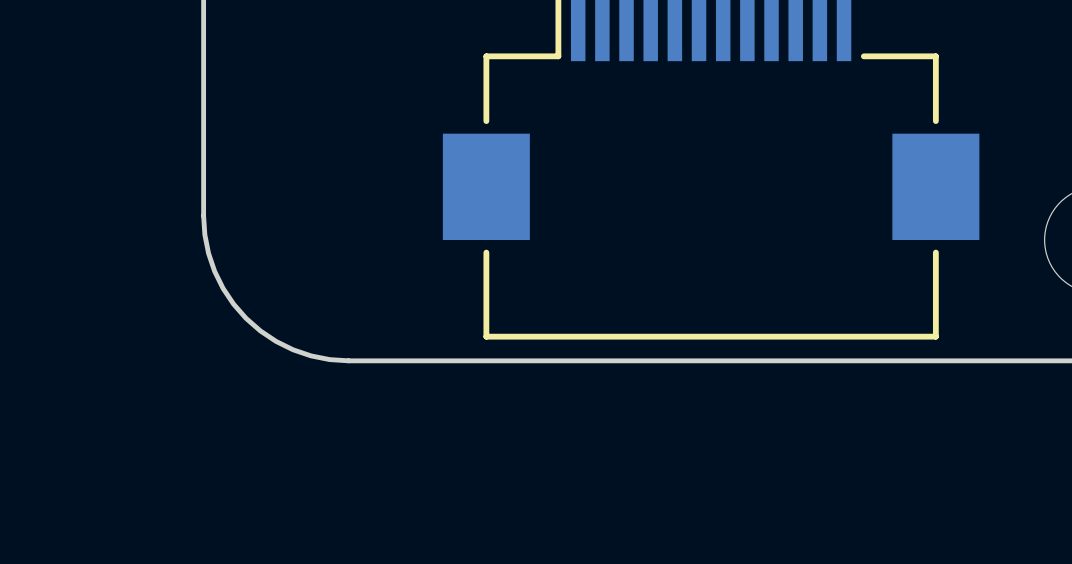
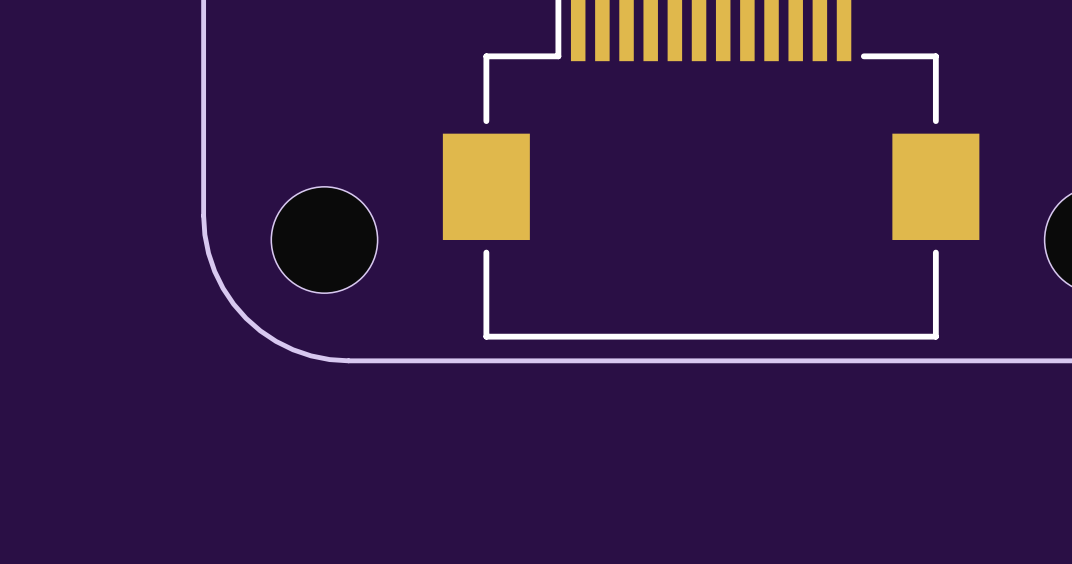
part: none -> (324, 240)

